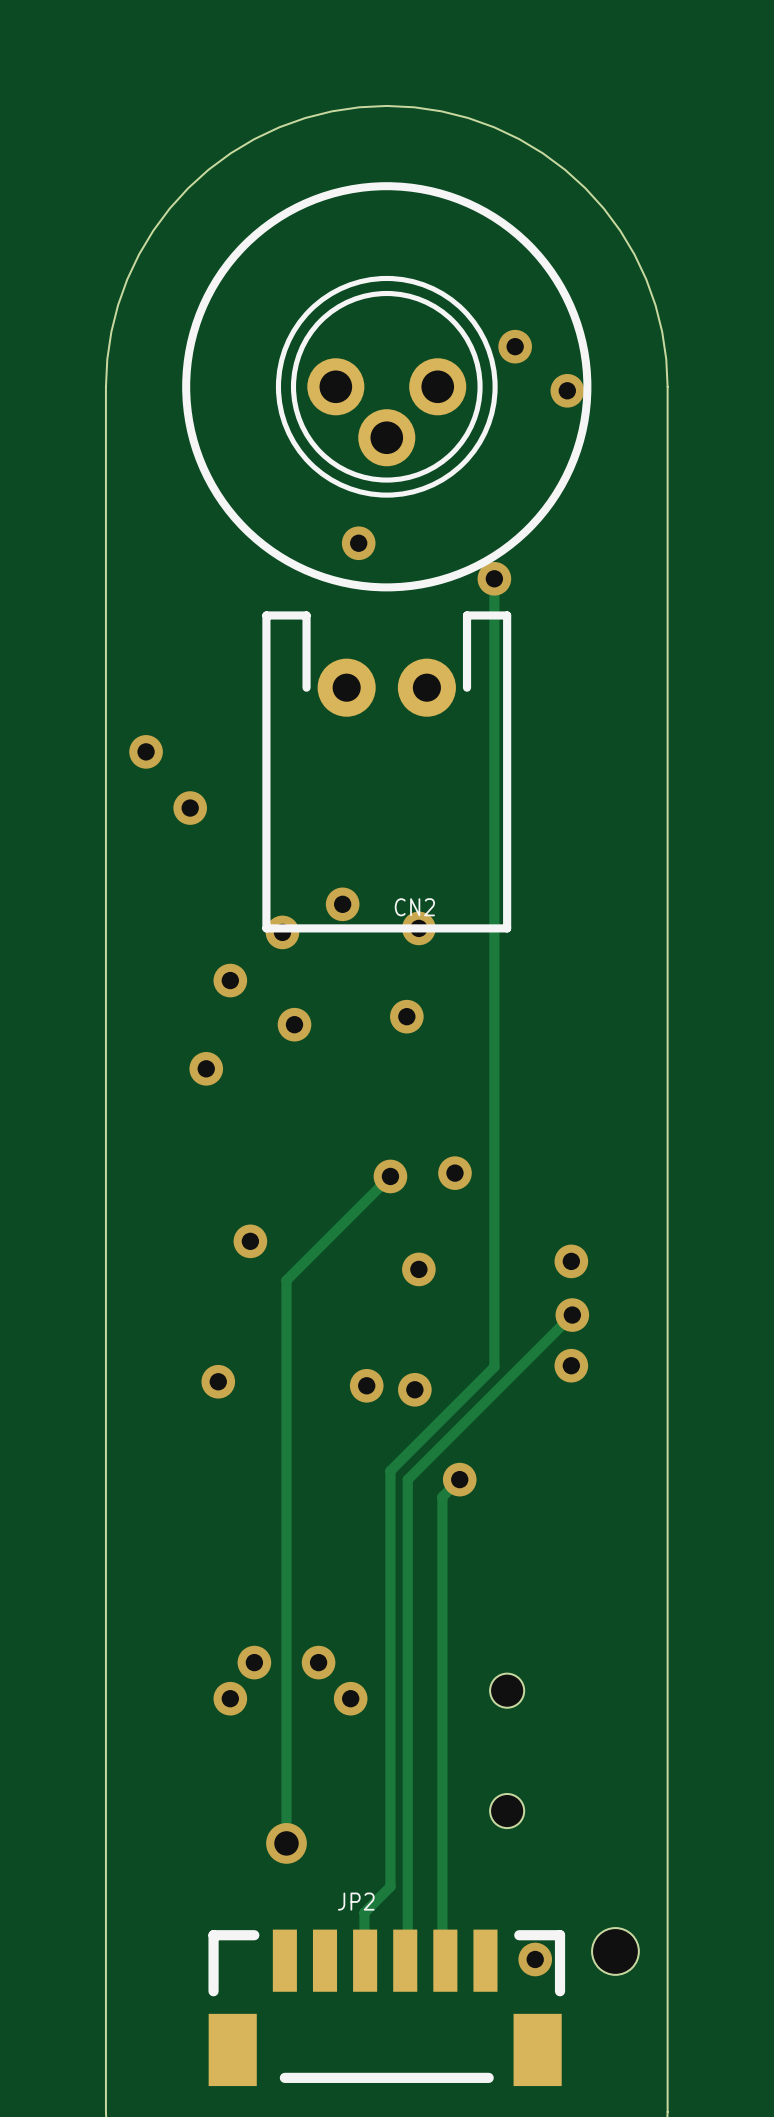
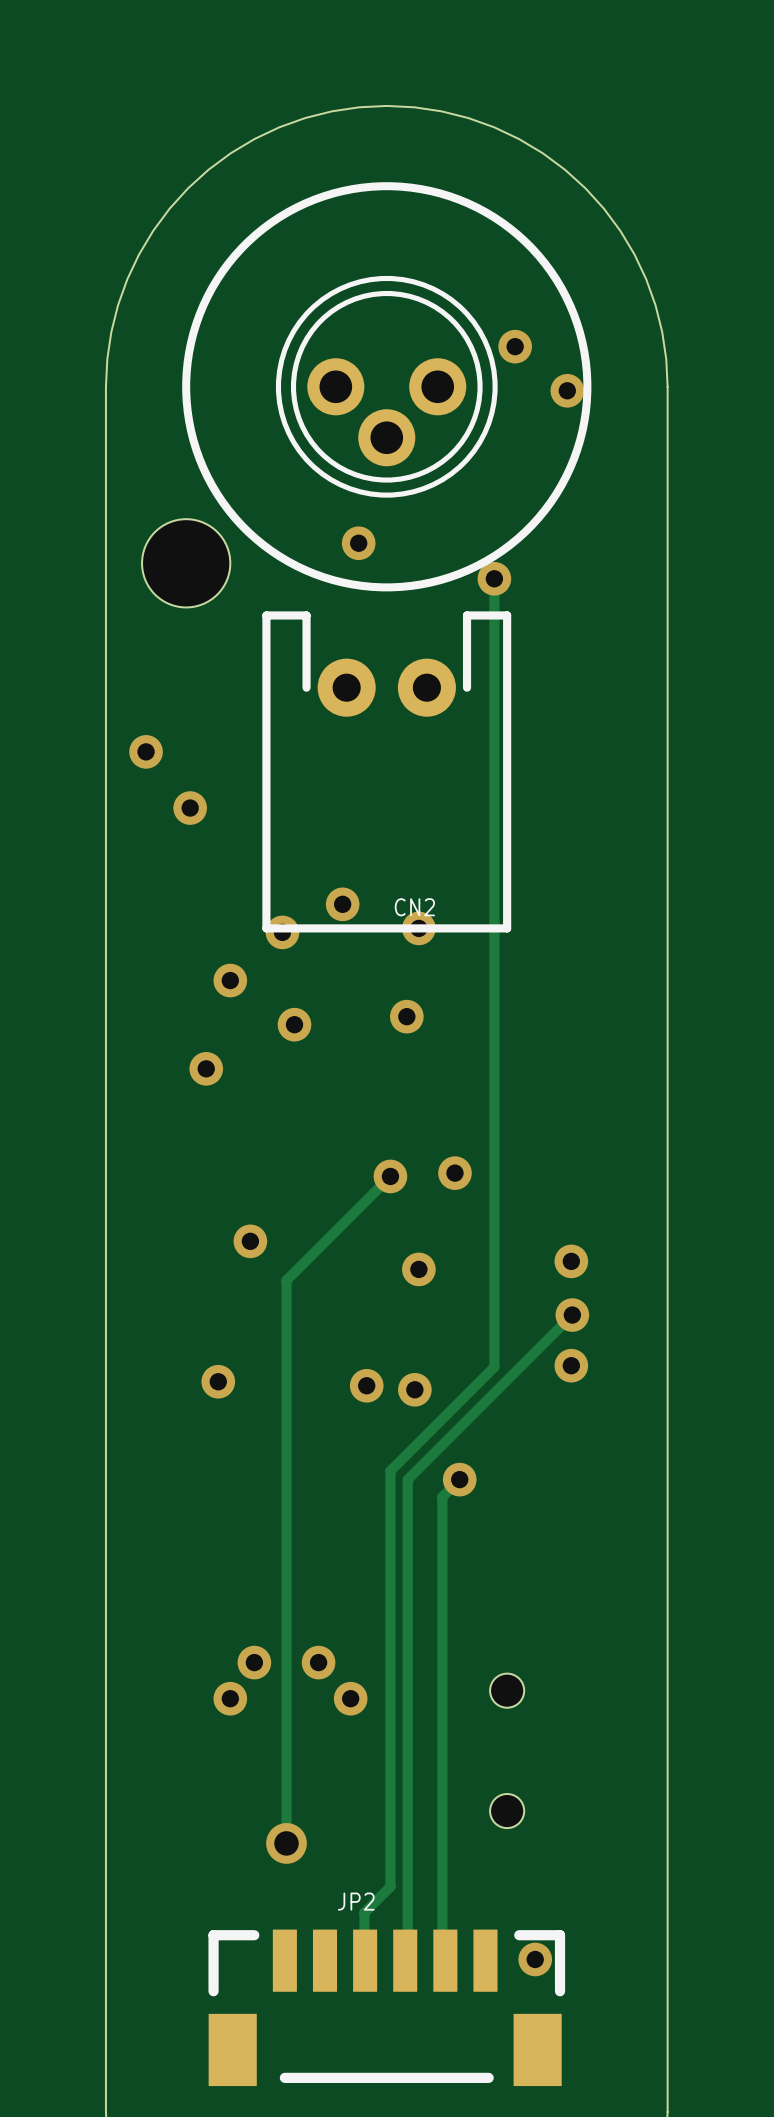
hole: none -> (186, 563)
hole: (615, 1951) -> none

